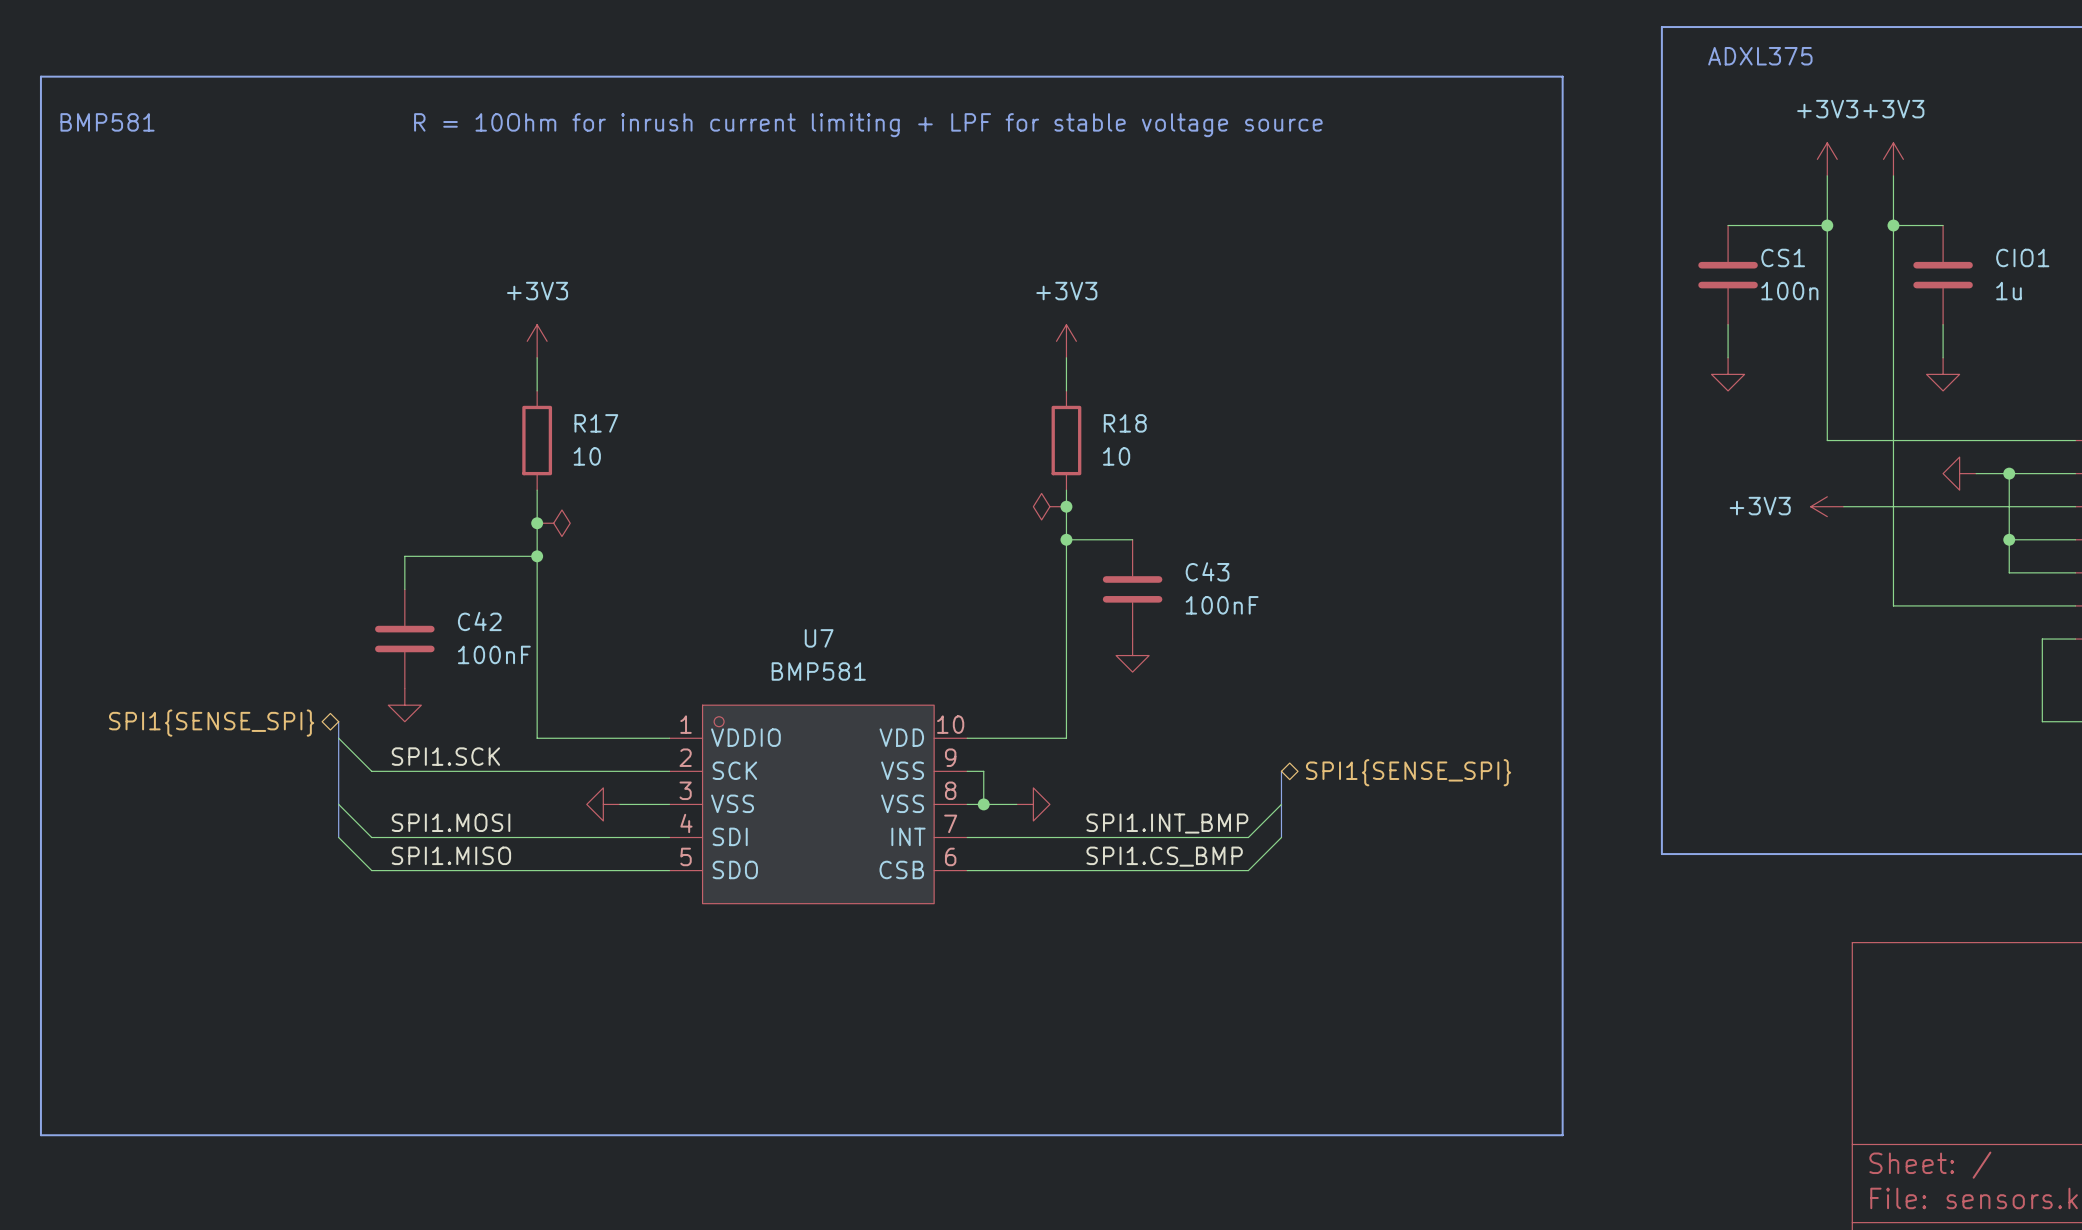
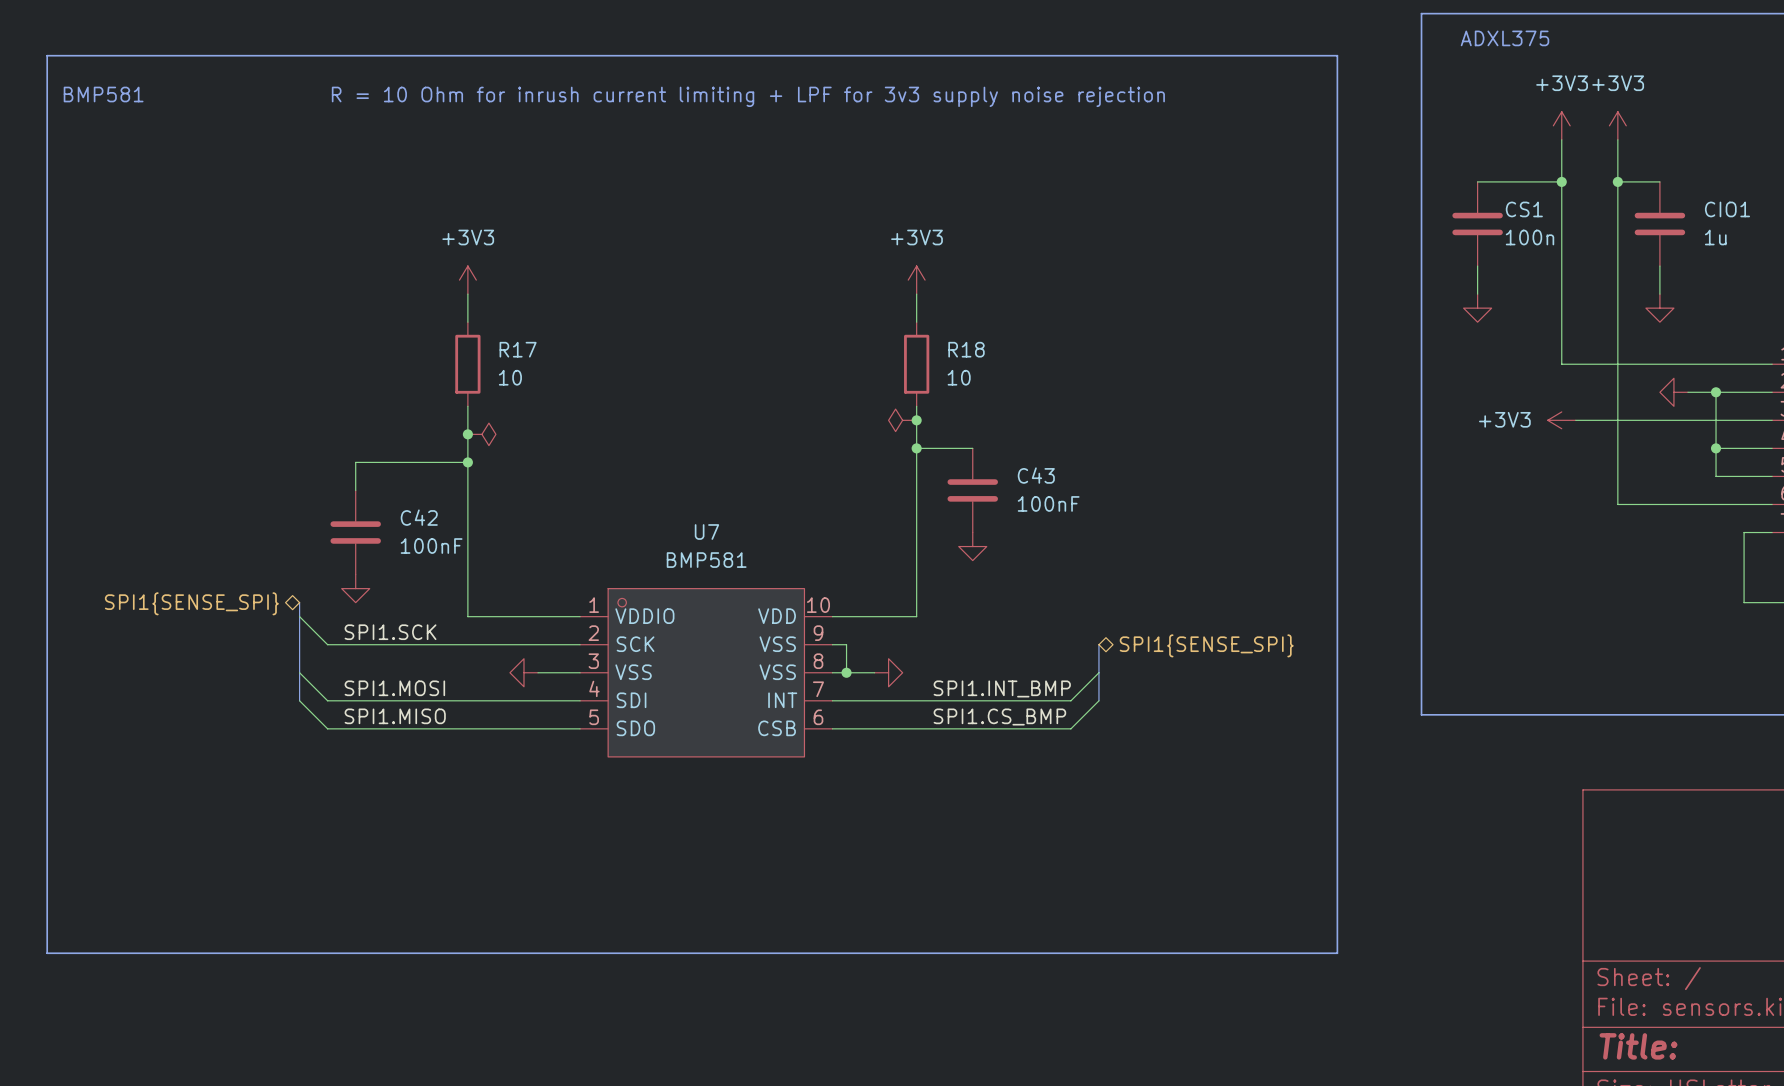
text: R = 10Ohm for inrush current limiting + LPF for stable voltage source (868, 125) -> R = 10 Ohm for inrush current limiting + LPF for 3v3 supply noise rejection (748, 96)

